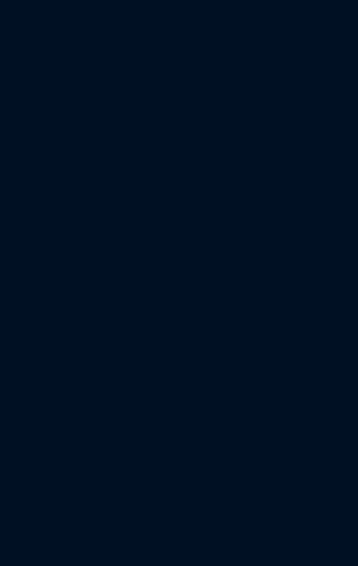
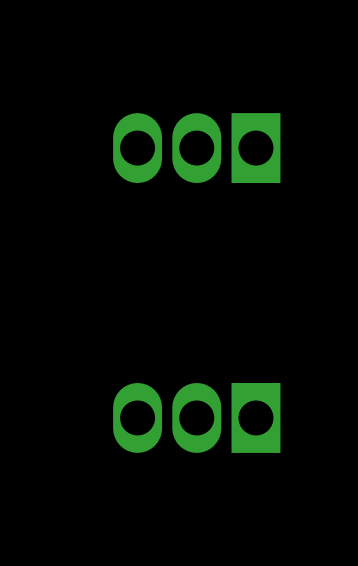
part: none -> (196, 148)
part: none -> (196, 417)

